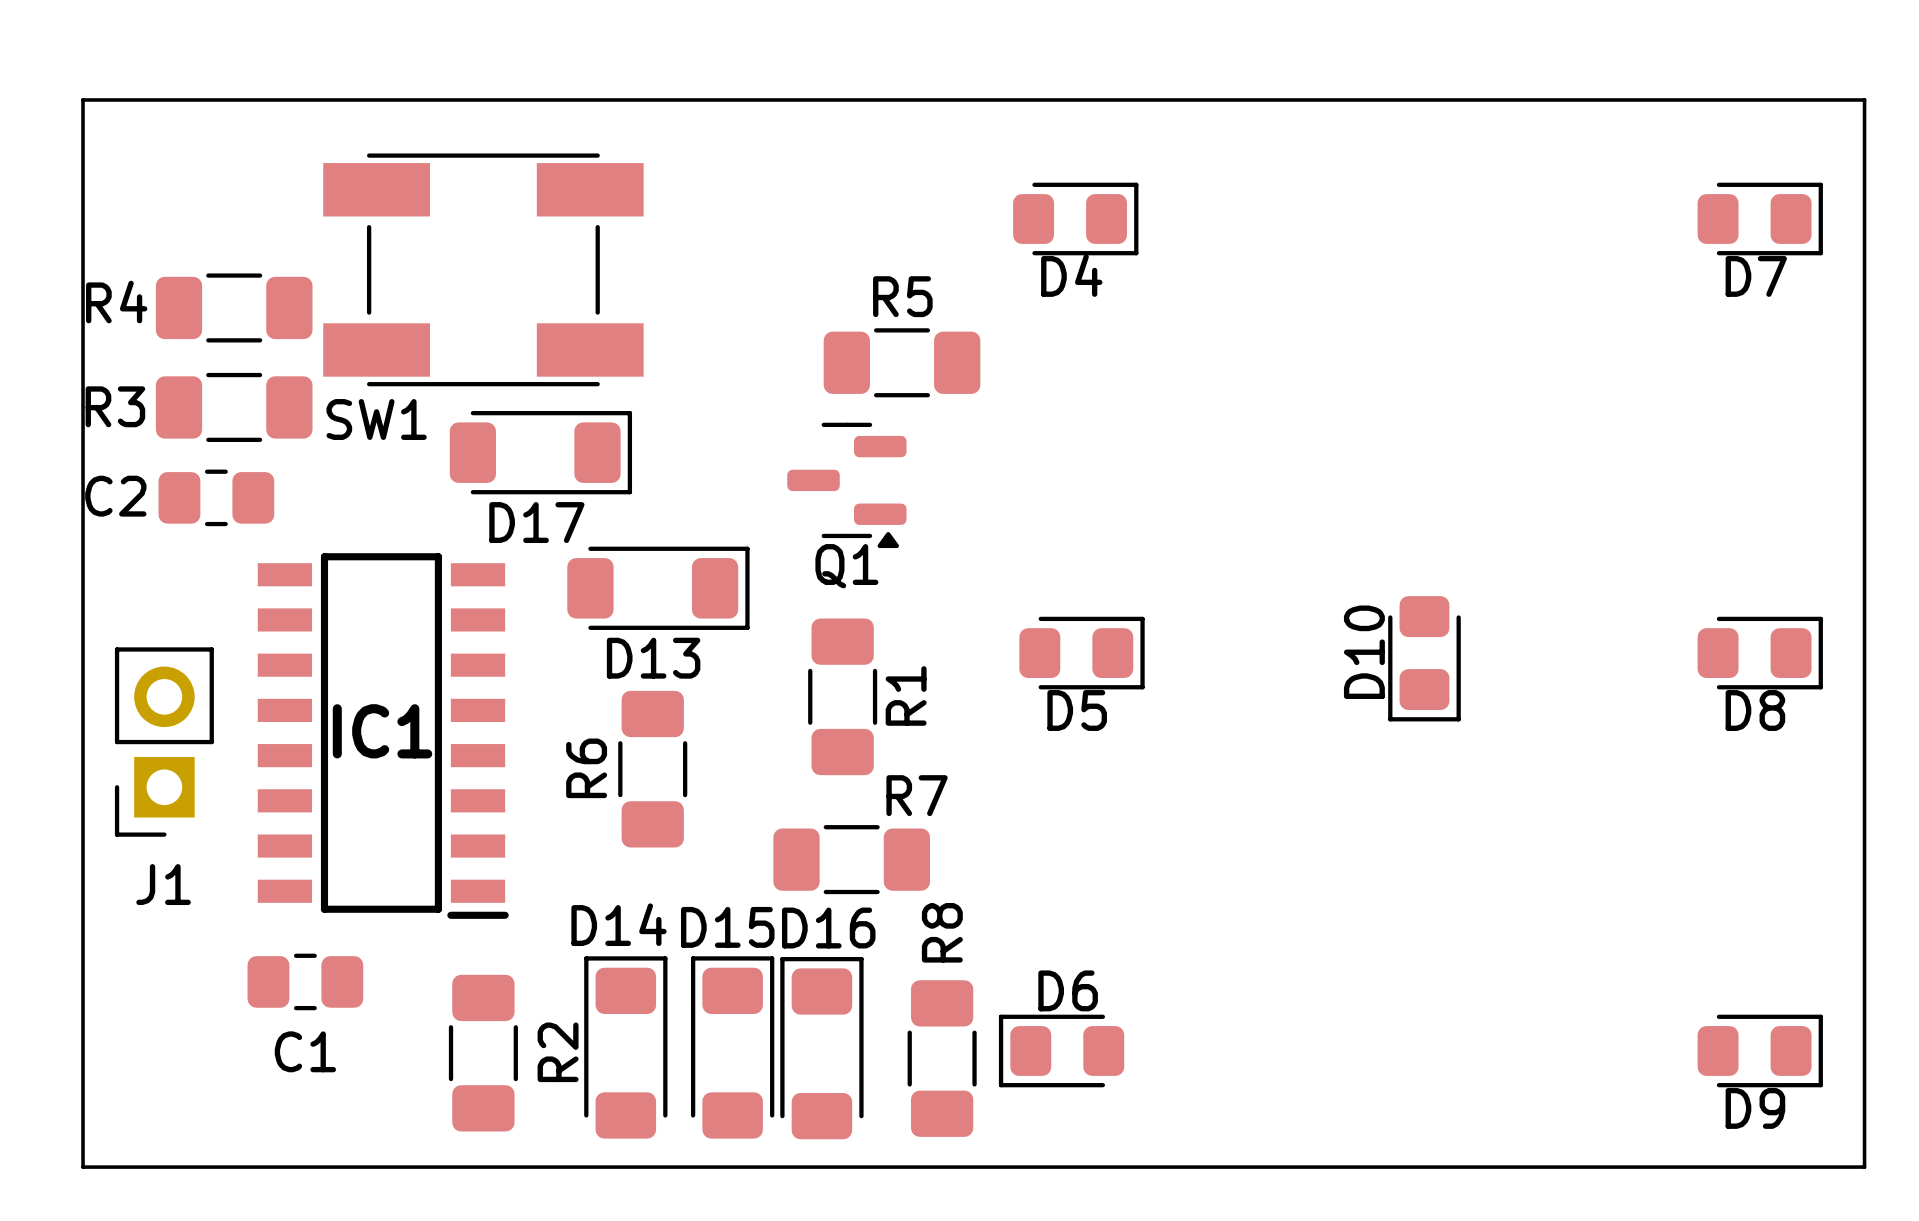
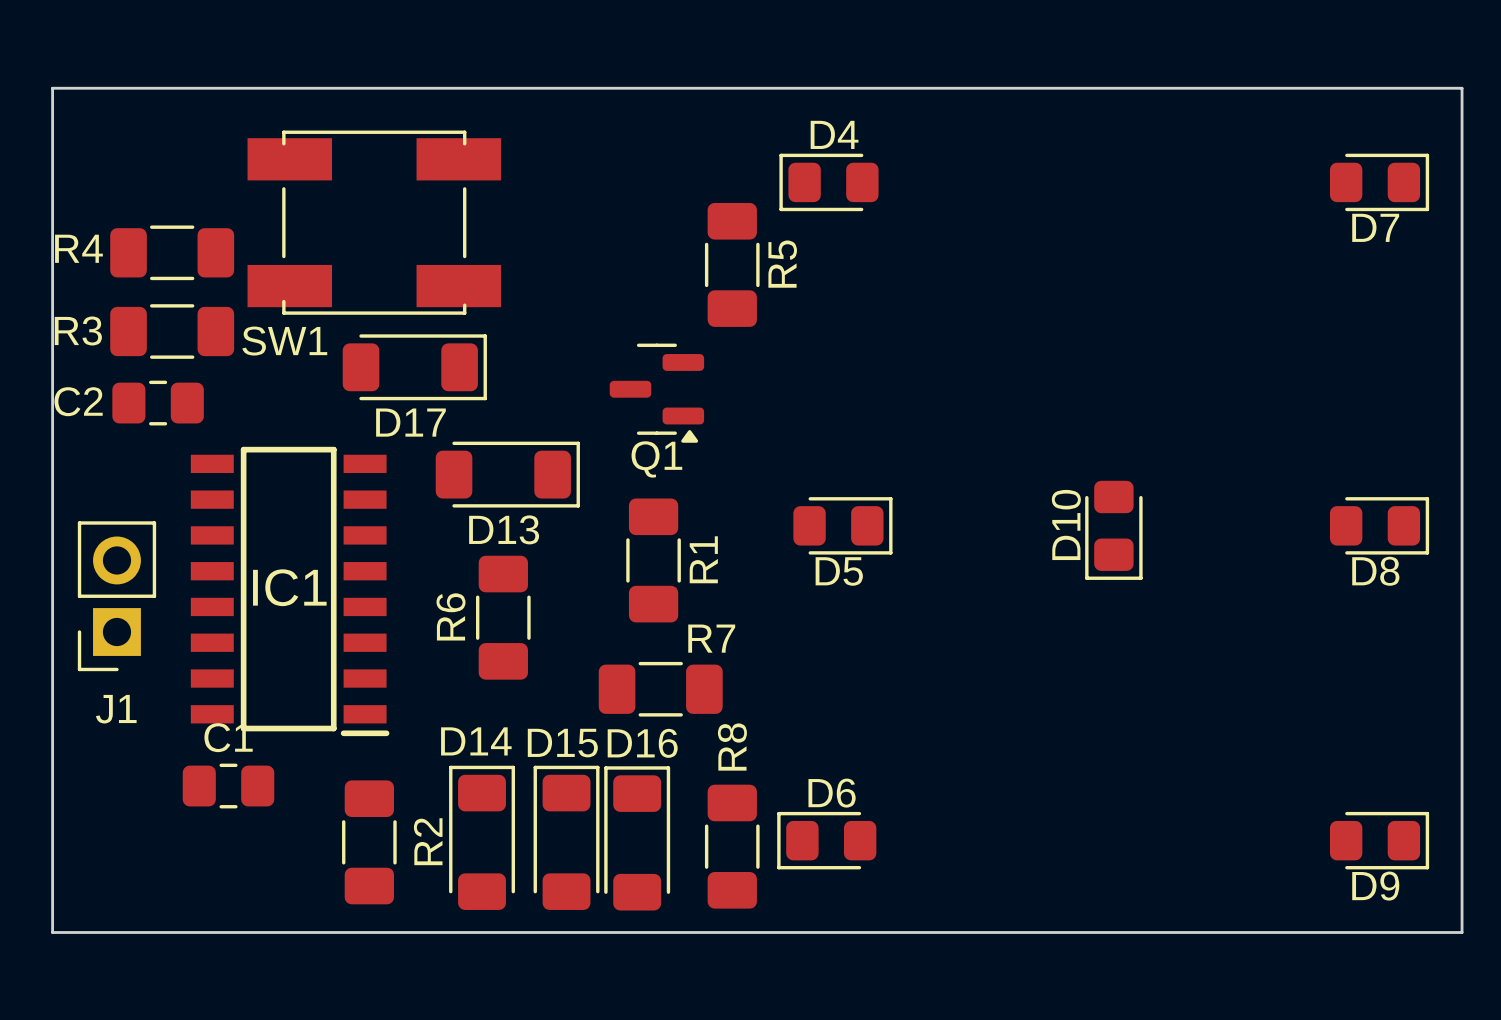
SW1 footprint: [323, 153, 644, 387] -> [247, 130, 502, 315]
D4 rotation: 0° (1075, 219) -> 180° (828, 182)
R5 rotation: 0° (902, 362) -> 90° clockwise (732, 264)
C1 name position: C1 (305, 1051) -> C1 (228, 737)

